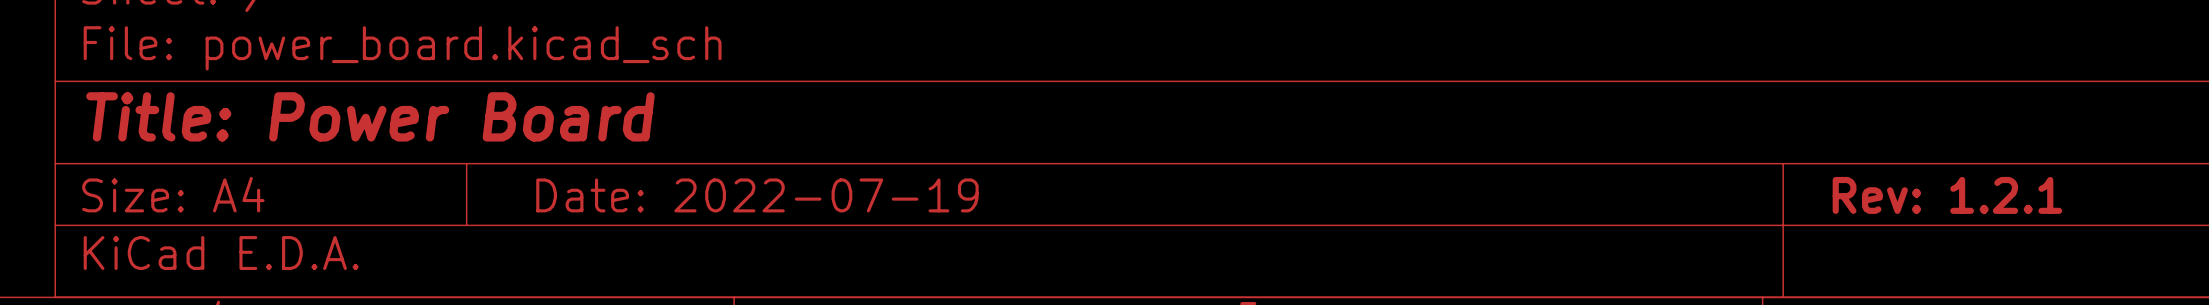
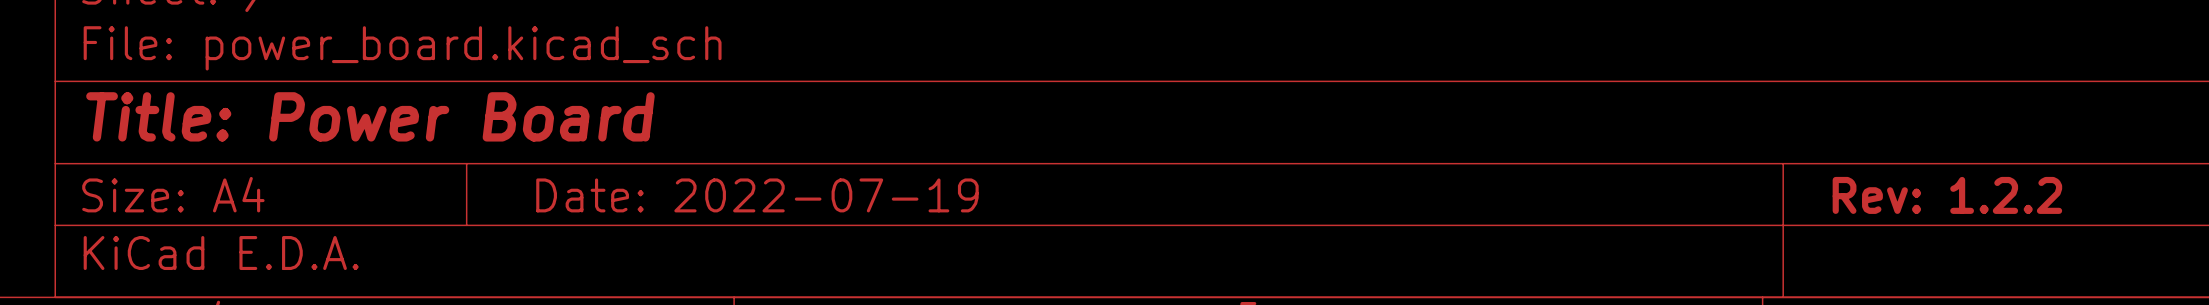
title block: Rev: 1.2.1 (1947, 195) -> Rev: 1.2.2 (1947, 195)

